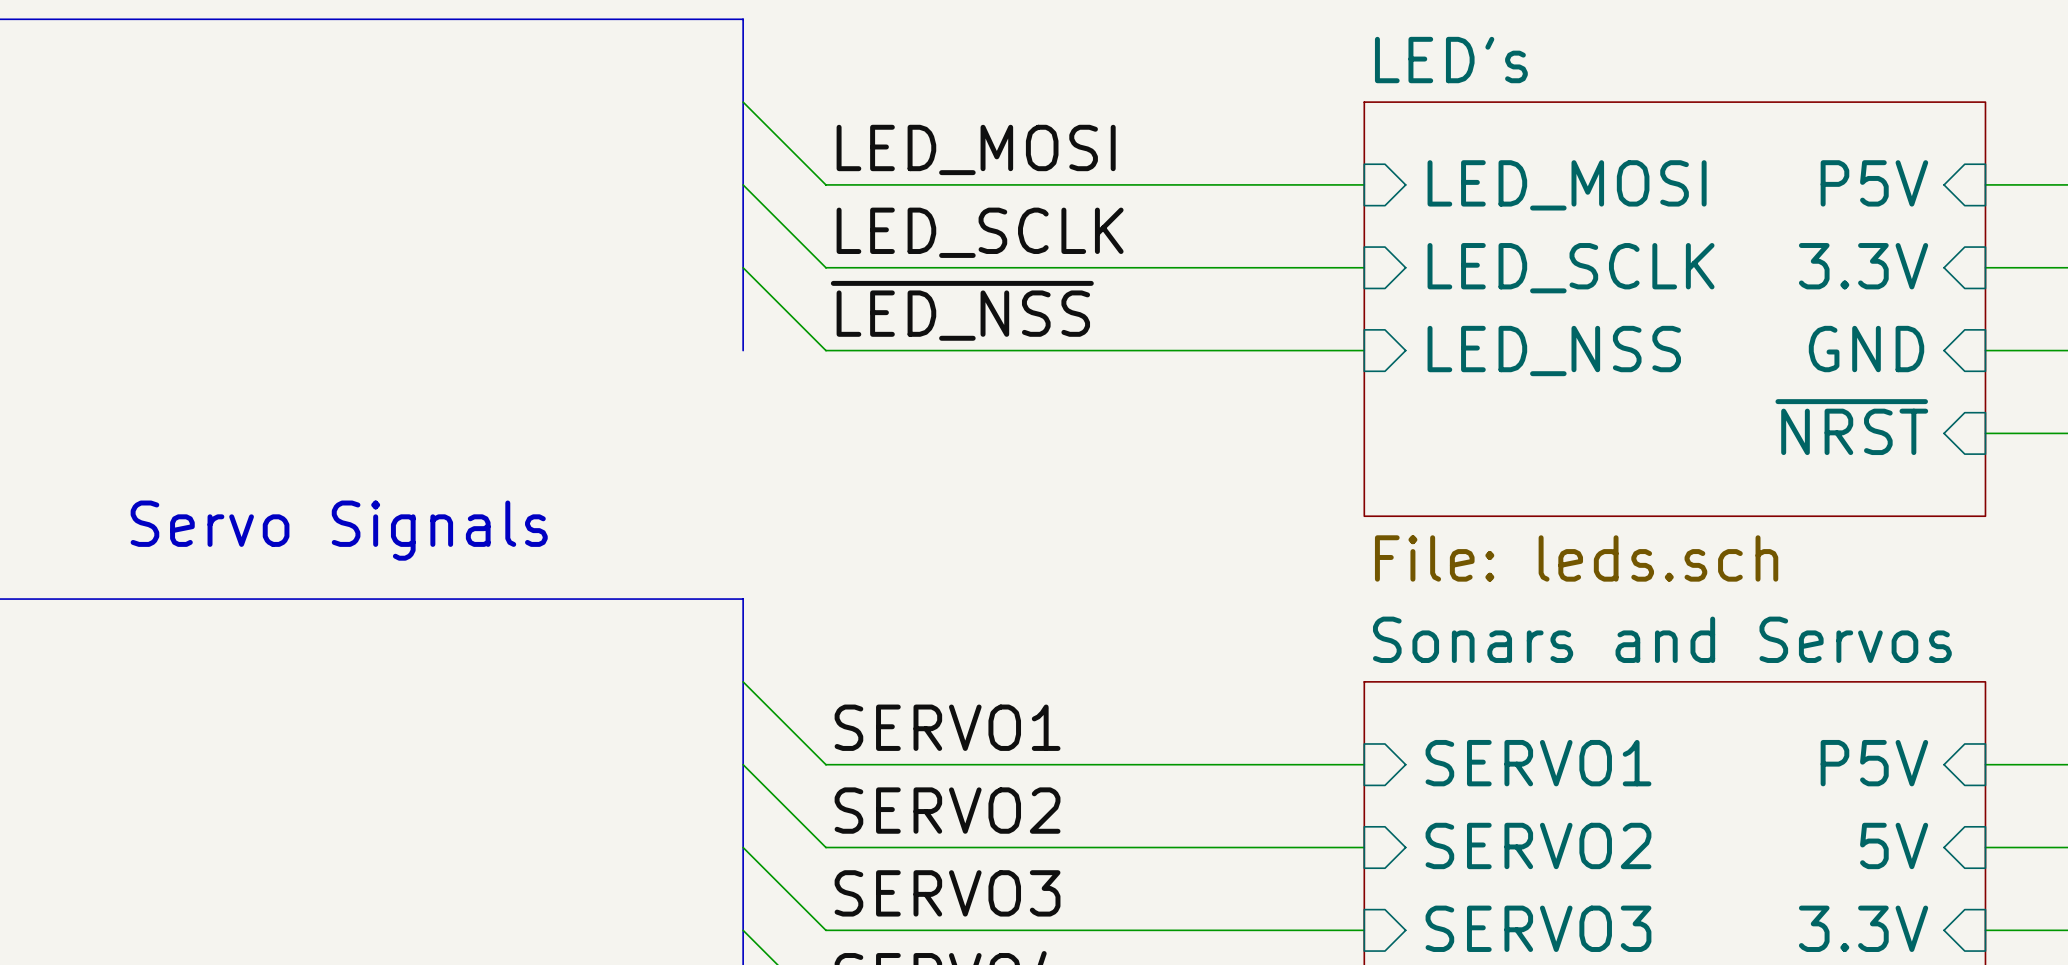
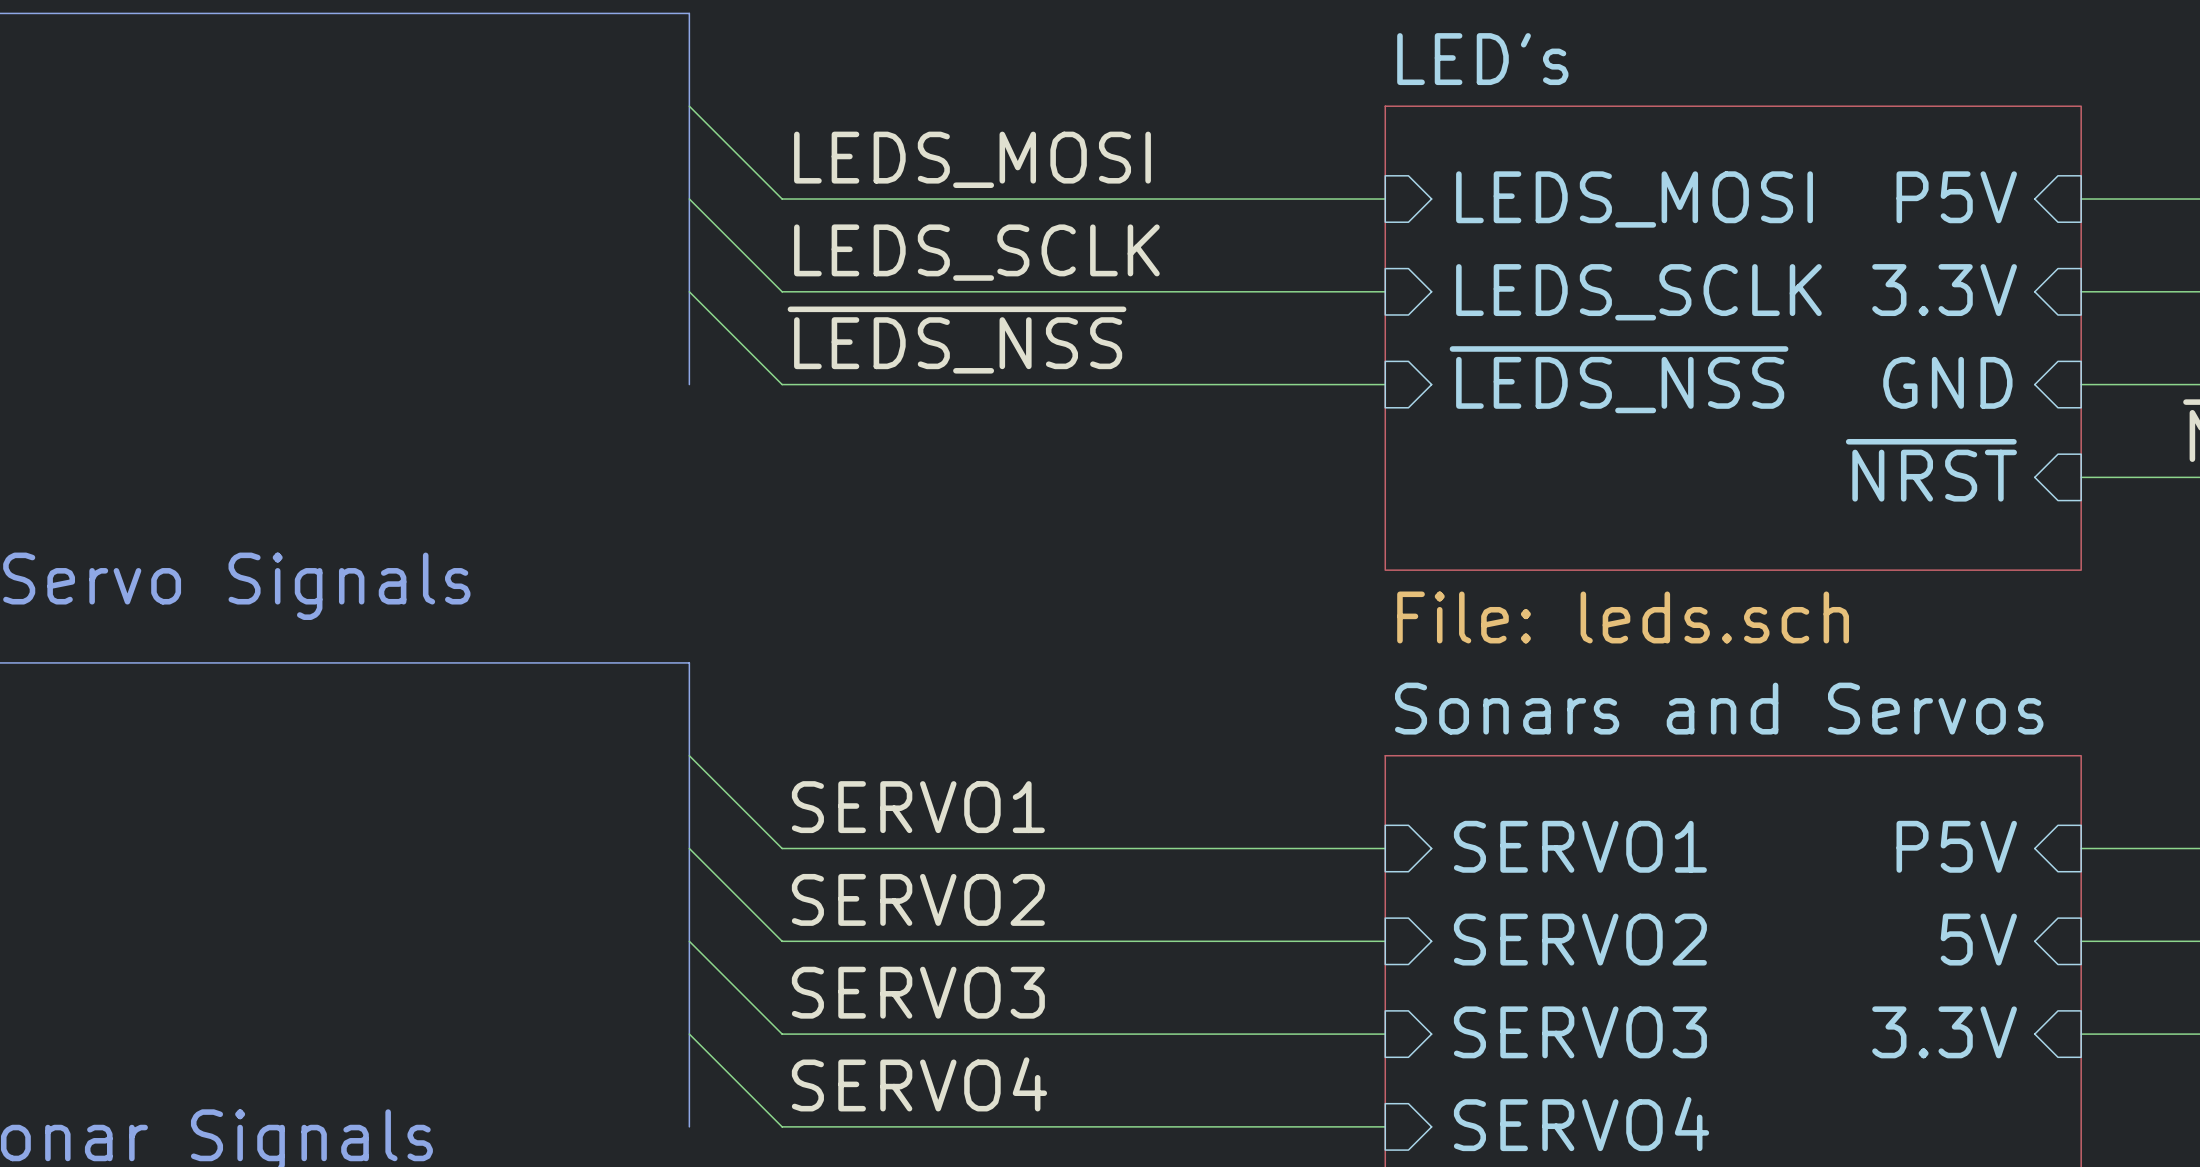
label: LED_MOSI (976, 149) -> LEDS_MOSI (972, 159)
sheet pin: LED_MOSI (1567, 185) -> LEDS_MOSI (1634, 199)
label: LED_SCLK (980, 232) -> LEDS_SCLK (976, 252)
sheet pin: LED_SCLK (1571, 268) -> LEDS_SCLK (1638, 292)
label: ~{LED_NSS} (962, 310) -> ~{LEDS_NSS} (957, 340)
sheet pin: LED_NSS (1554, 351) -> ~{LEDS_NSS} (1619, 379)

